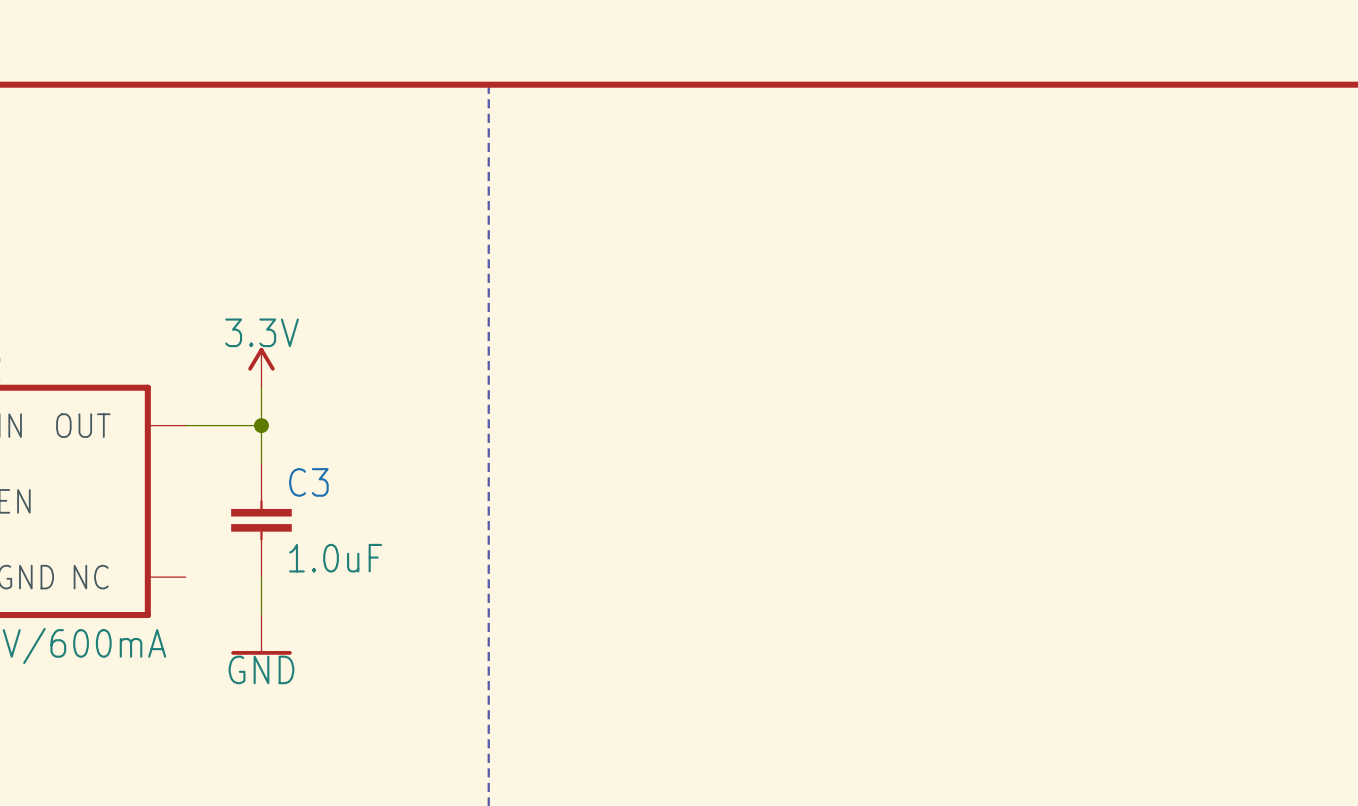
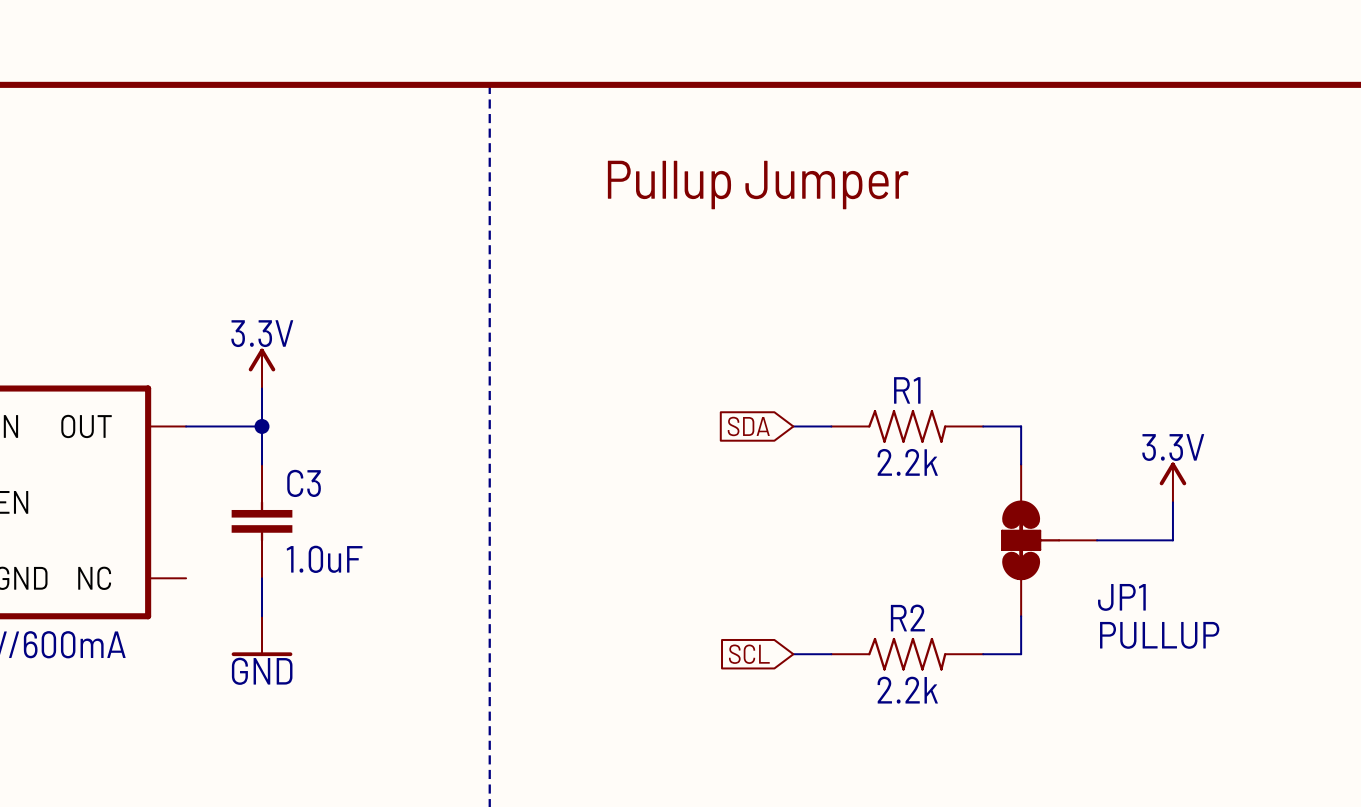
text: none -> Pullup Jumper (758, 184)
global label: none -> SDA (748, 426)
wire: none -> (793, 426) (831, 426)
R1: none -> 2.2k (907, 426)
wire: none -> (983, 426) (1021, 426) (1021, 464)
power symbol: none -> 3.3V (1172, 482)
wire: none -> (1172, 502) (1172, 540) (1097, 540)
JP1: none -> PULLUP (1049, 540)
wire: none -> (1021, 616) (1021, 654) (983, 654)
global label: none -> SCL (749, 654)
wire: none -> (793, 654) (831, 654)
R2: none -> 2.2k (907, 654)

